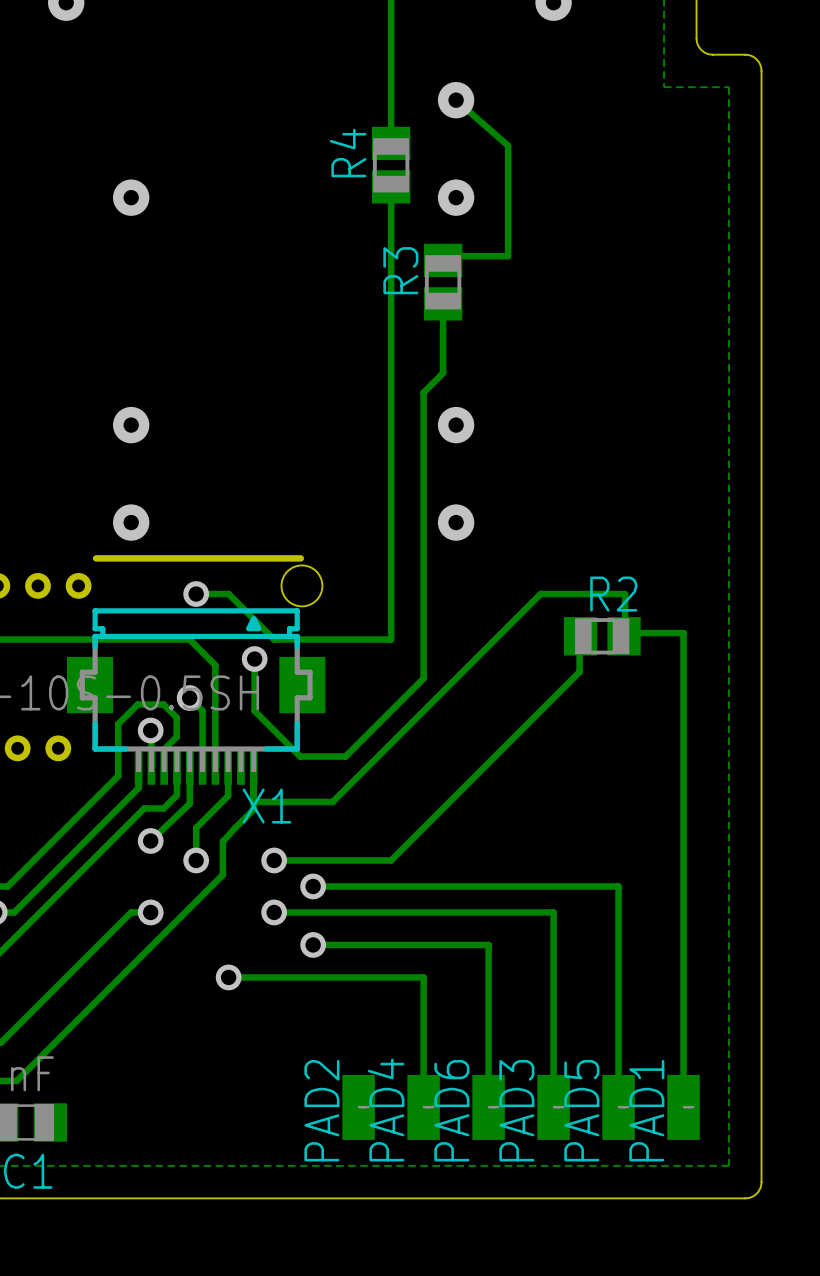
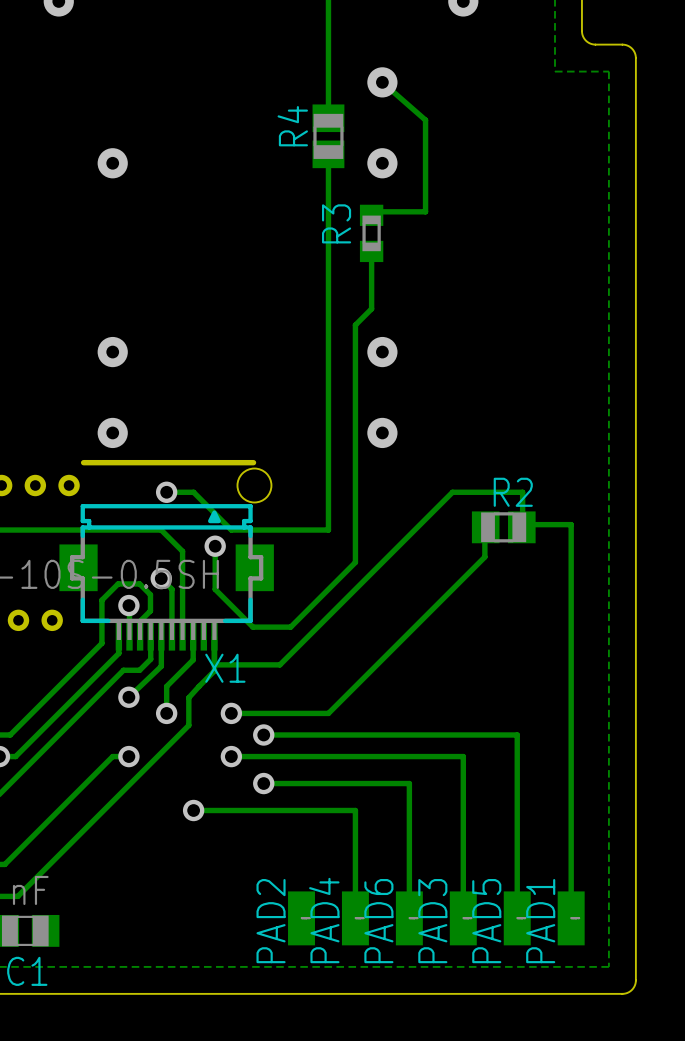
R3 footprint: [423, 243, 463, 321] -> [359, 204, 384, 263]

